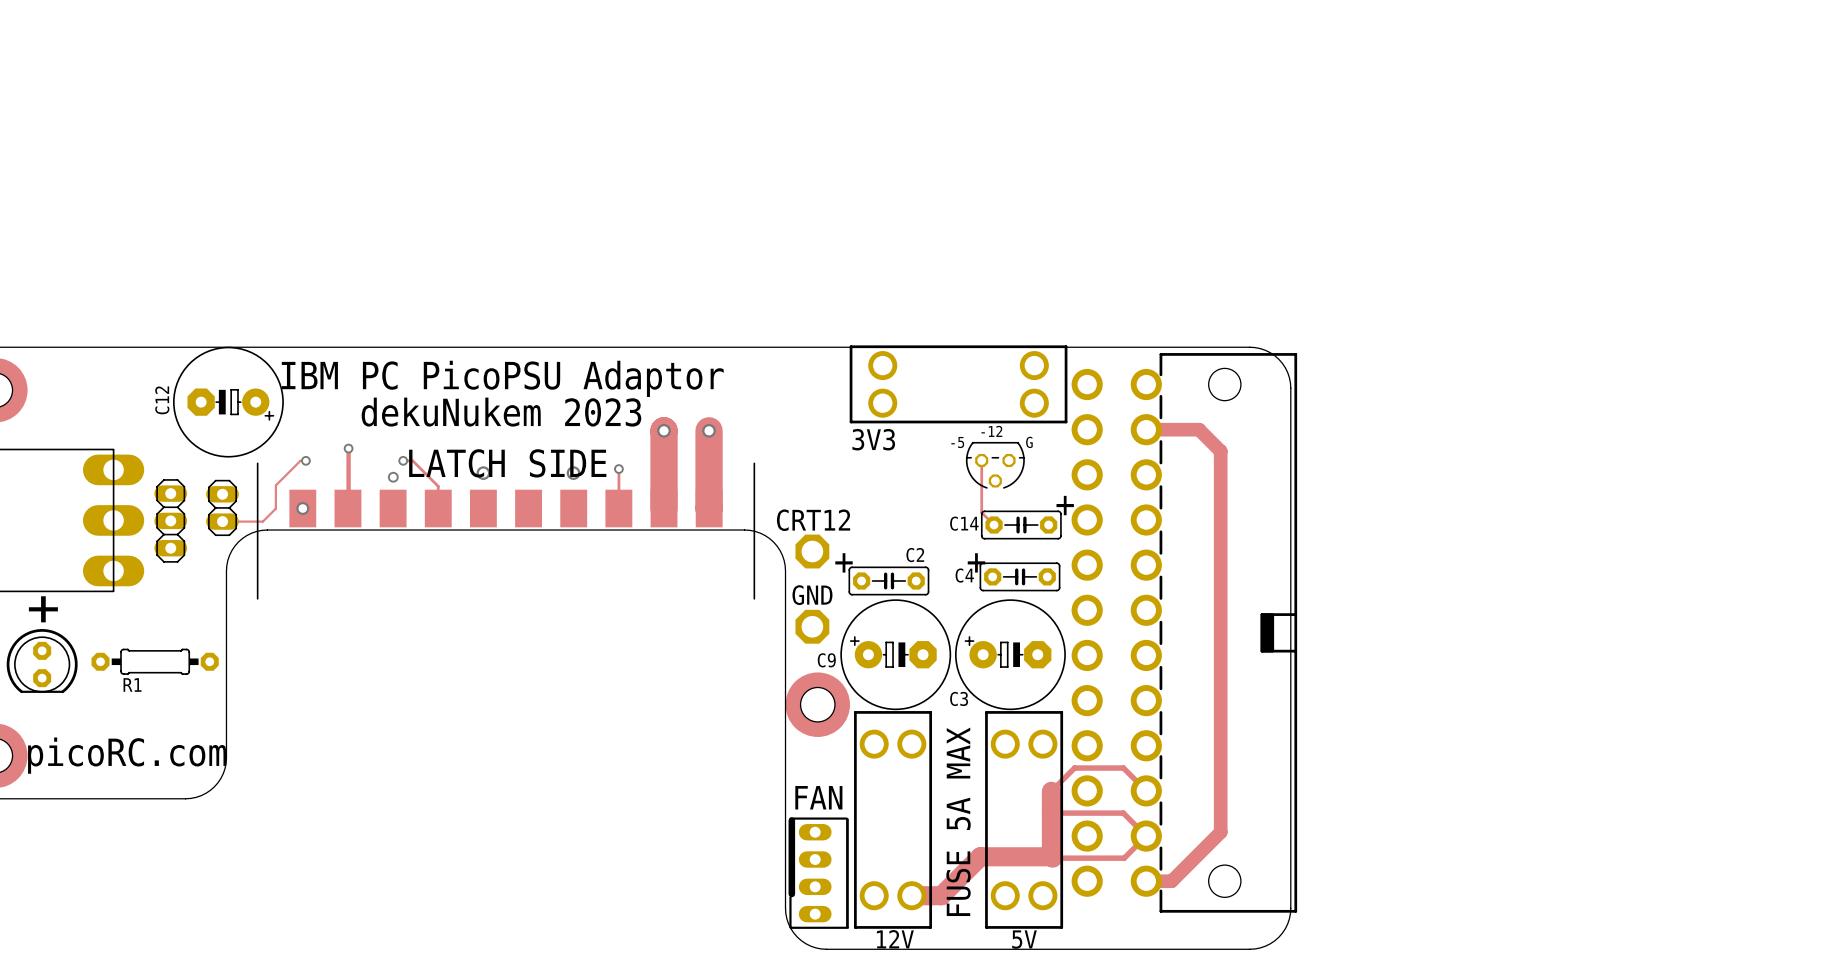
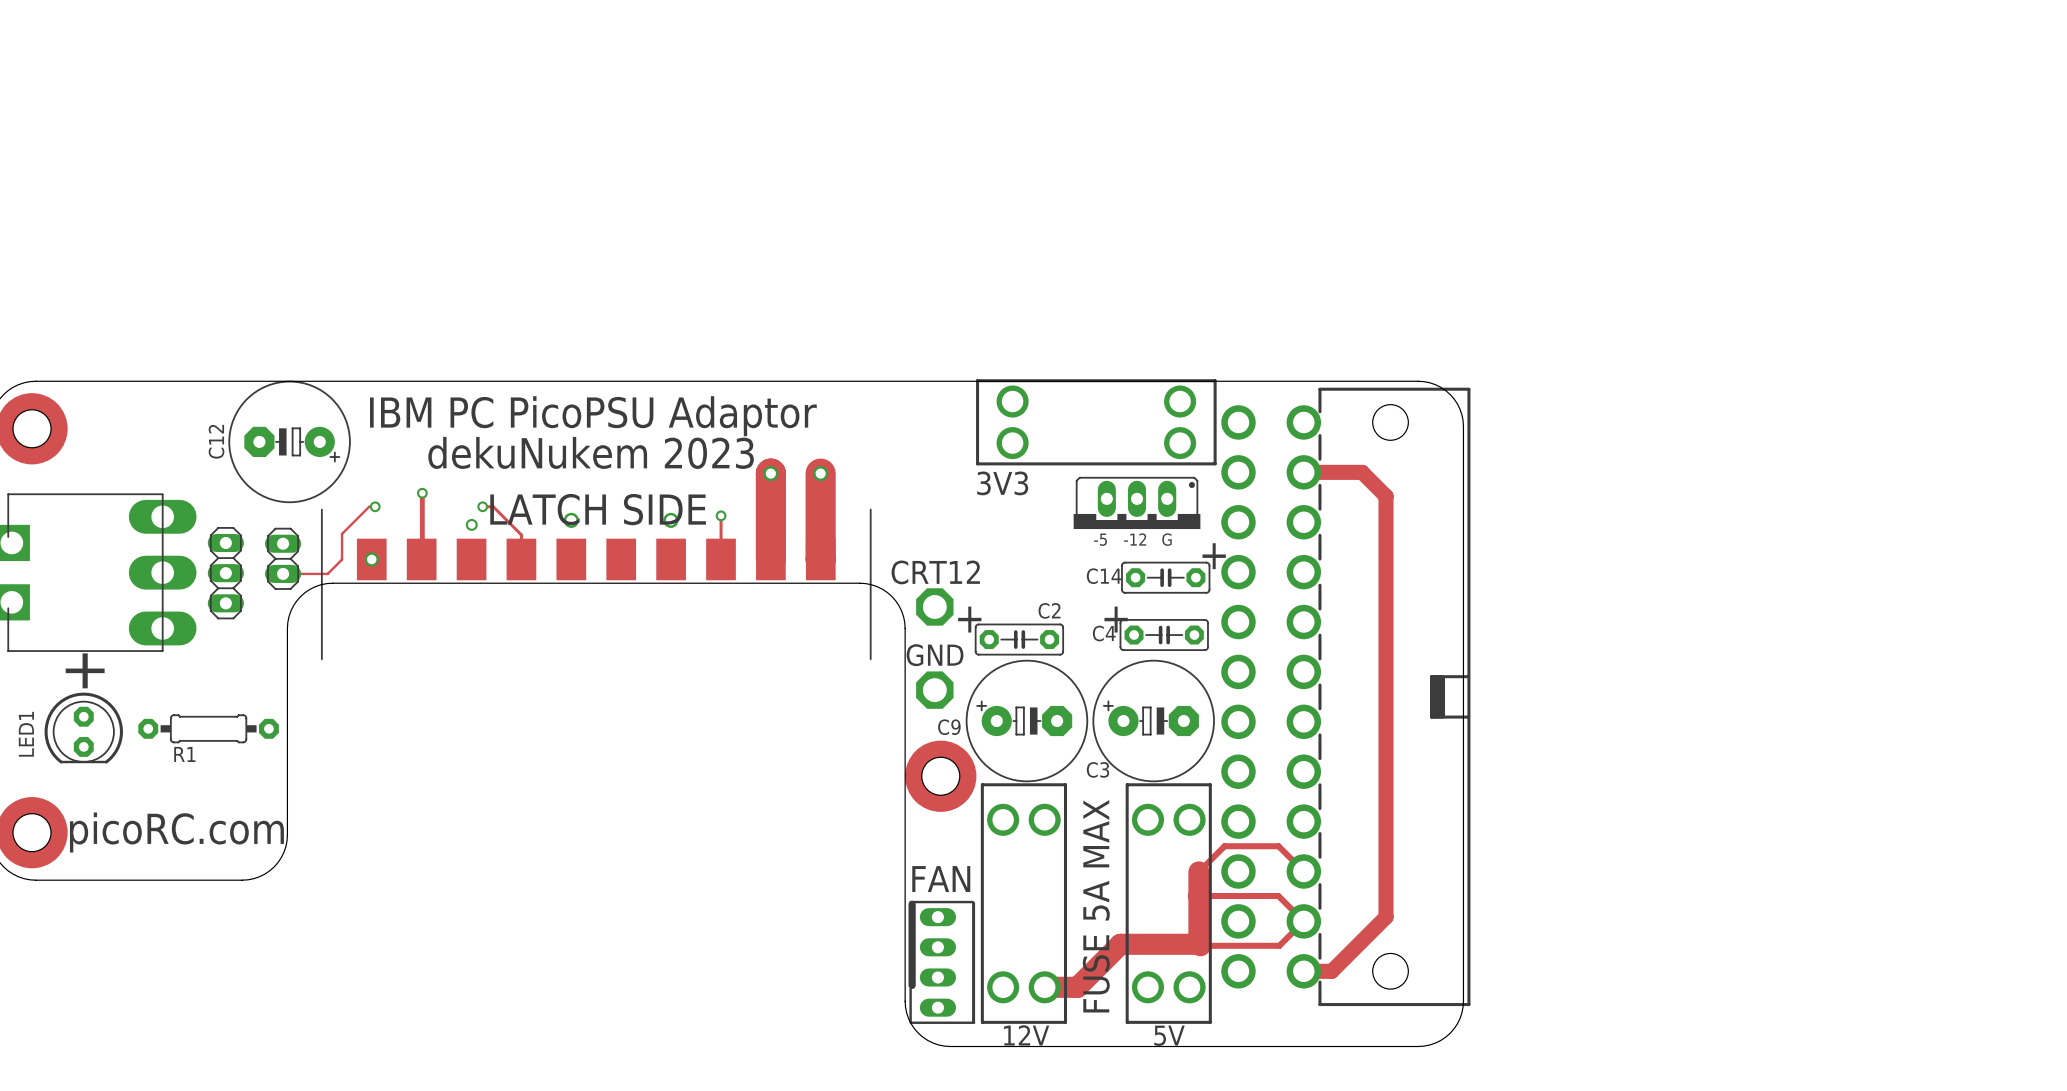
text position: -12 (991, 431) -> -12 (1135, 539)
part footprint: [965, 441, 1025, 489] -> [1073, 476, 1201, 530]
text position: -5 (957, 442) -> -5 (1100, 539)
text position: G (1029, 442) -> G (1166, 539)
track: (981, 460) (981, 512) (994, 525) -> none

